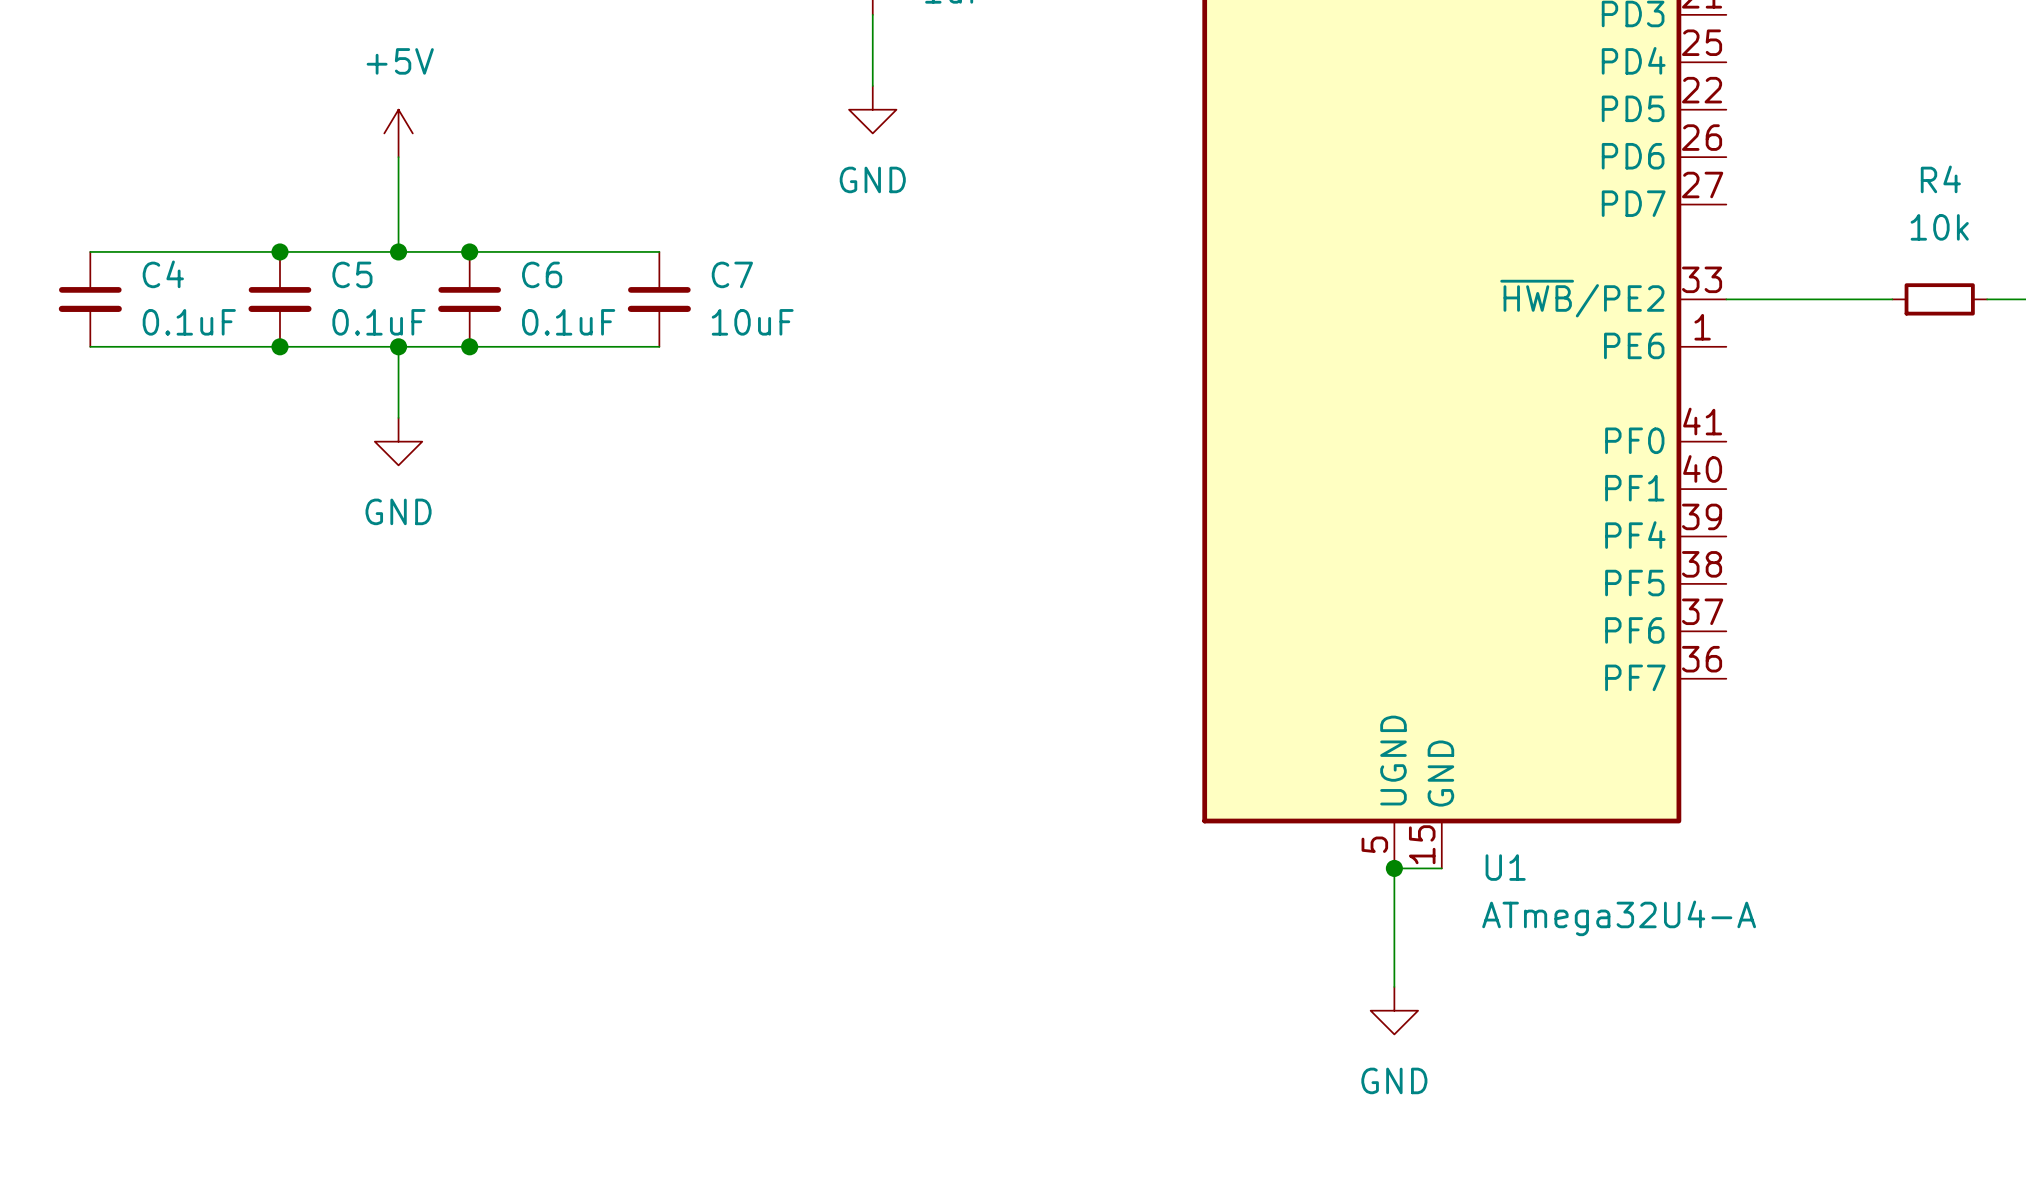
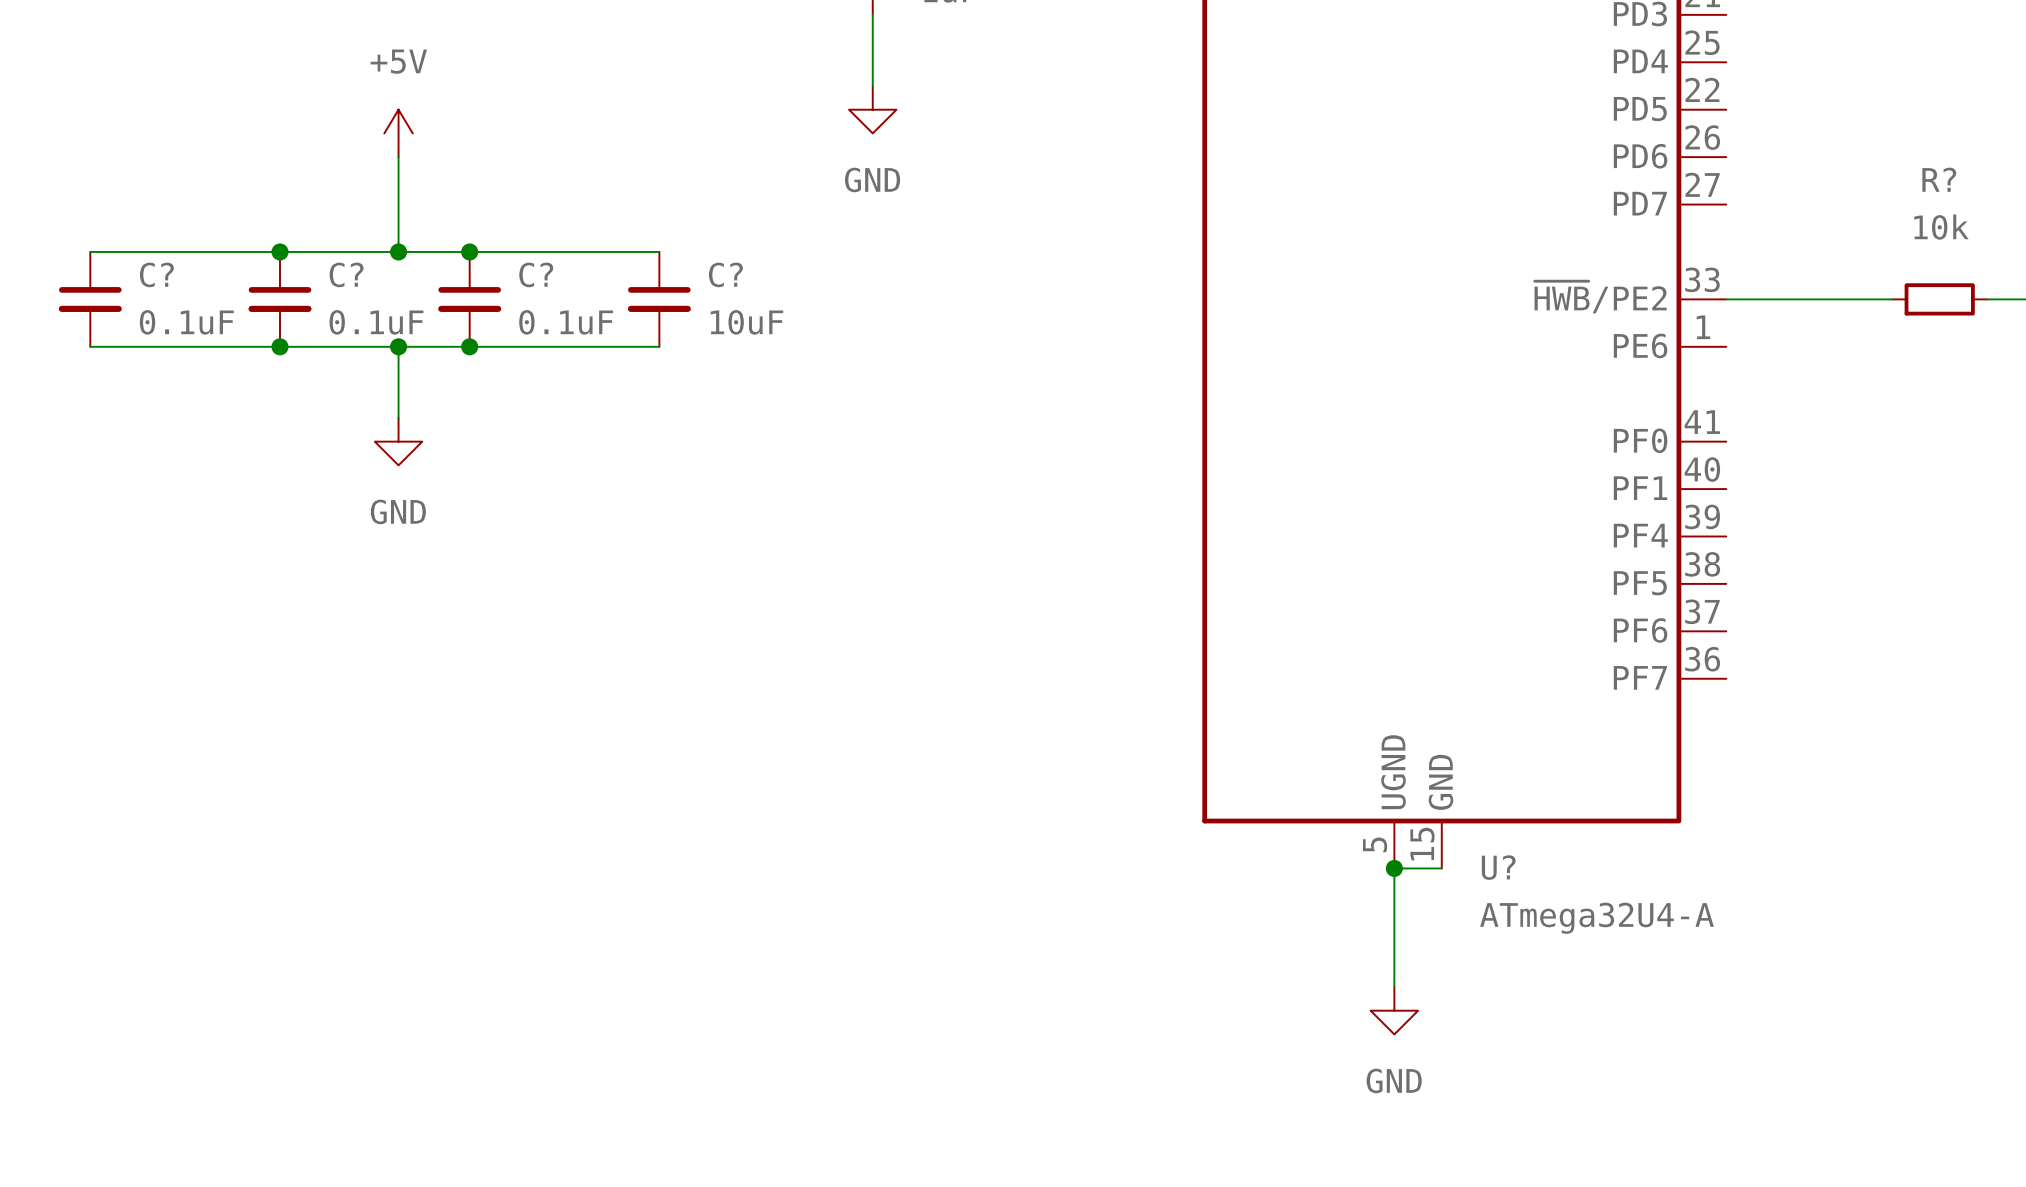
R4 name: R4 (1940, 179) -> R? (1939, 179)
C4 name: C4 (163, 274) -> C? (156, 274)
C5 name: C5 (352, 274) -> C? (346, 274)
C6 name: C6 (542, 274) -> C? (536, 274)
C7 name: C7 (732, 274) -> C? (725, 274)
U1 name: U1 (1505, 867) -> U? (1498, 867)

